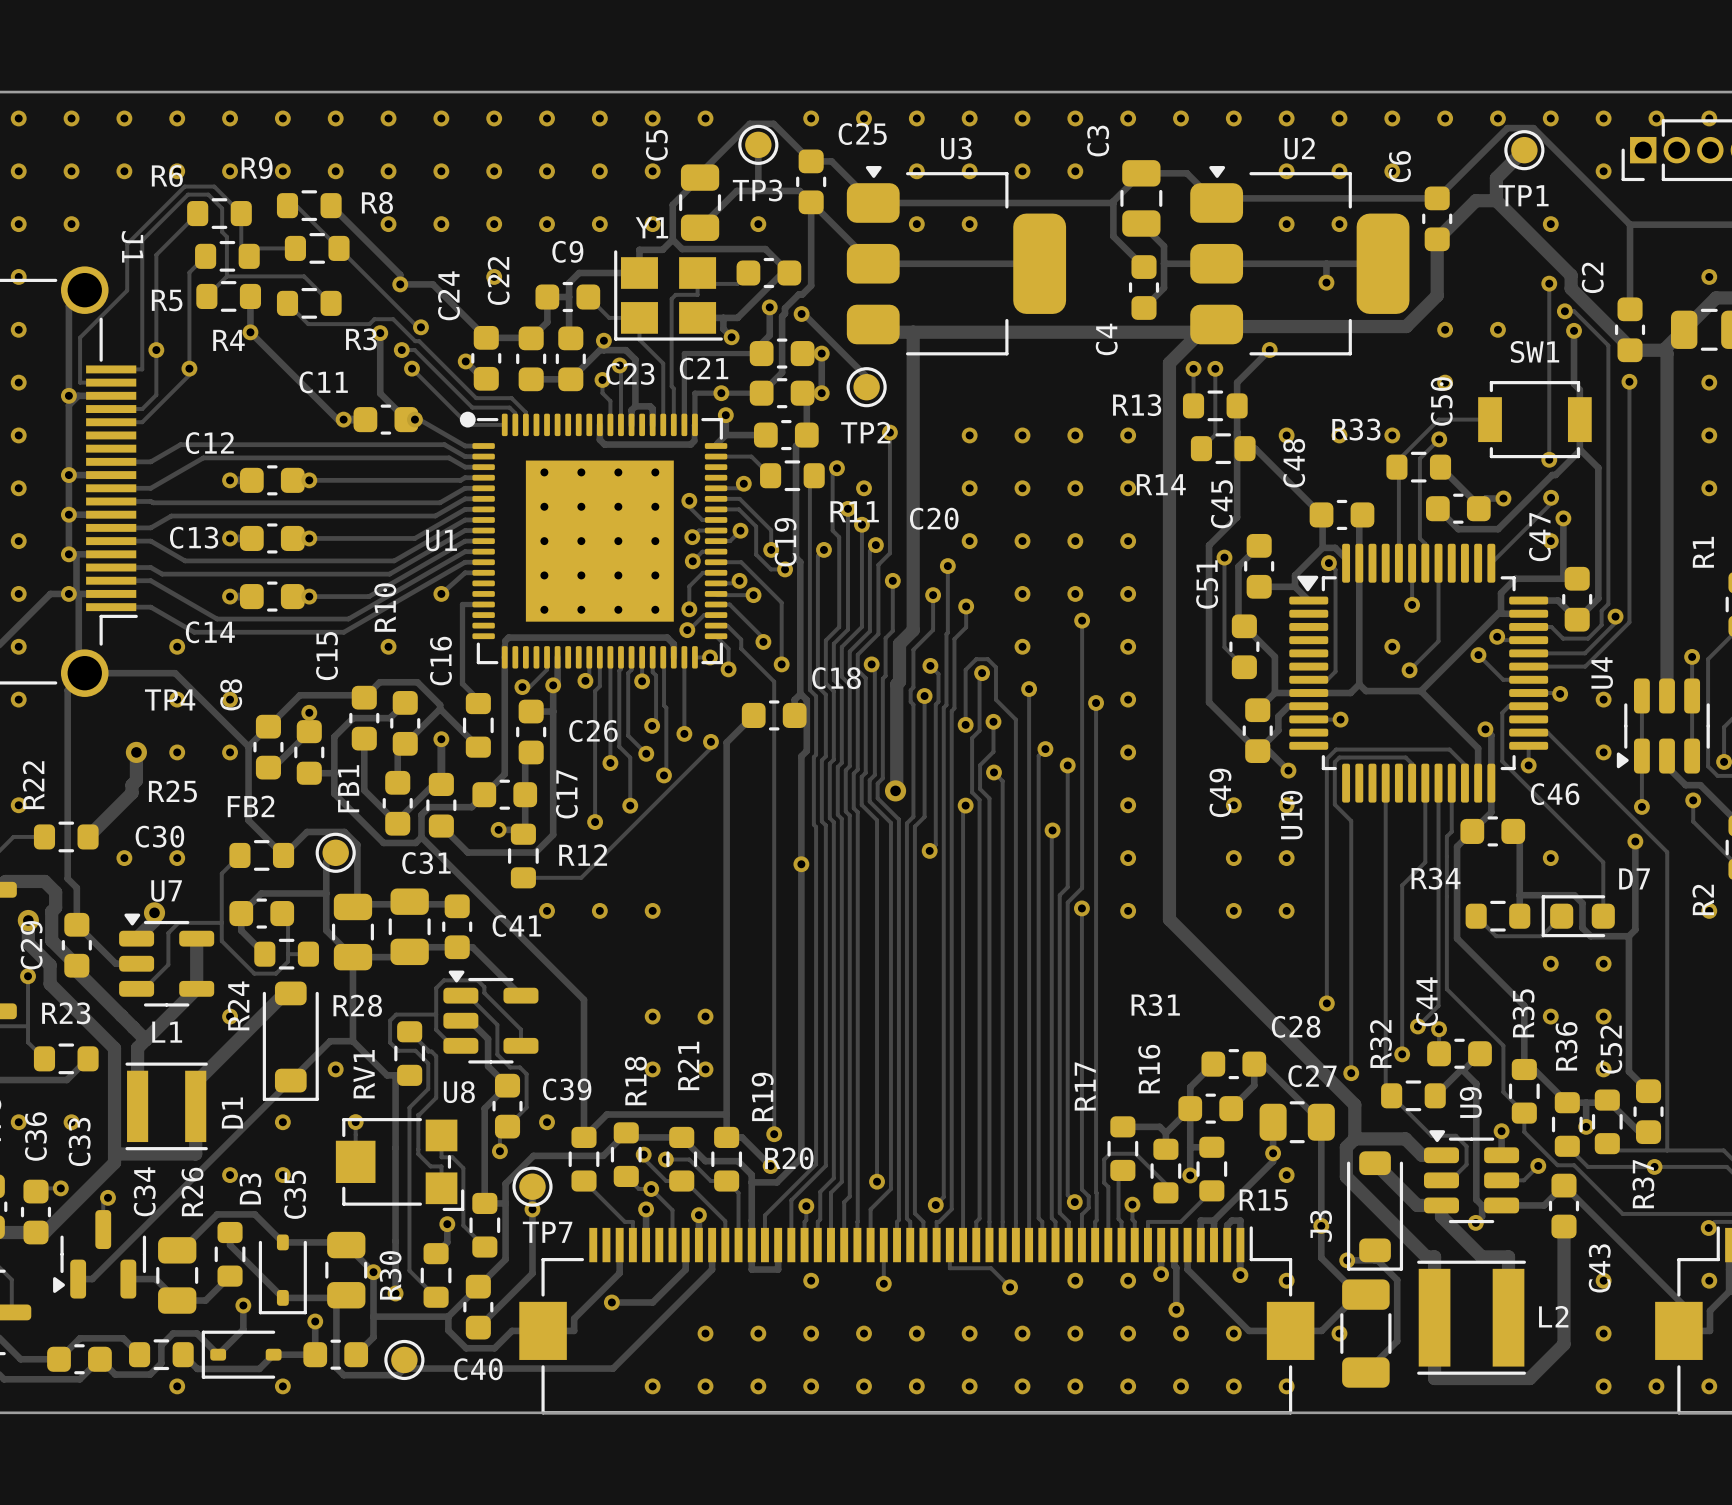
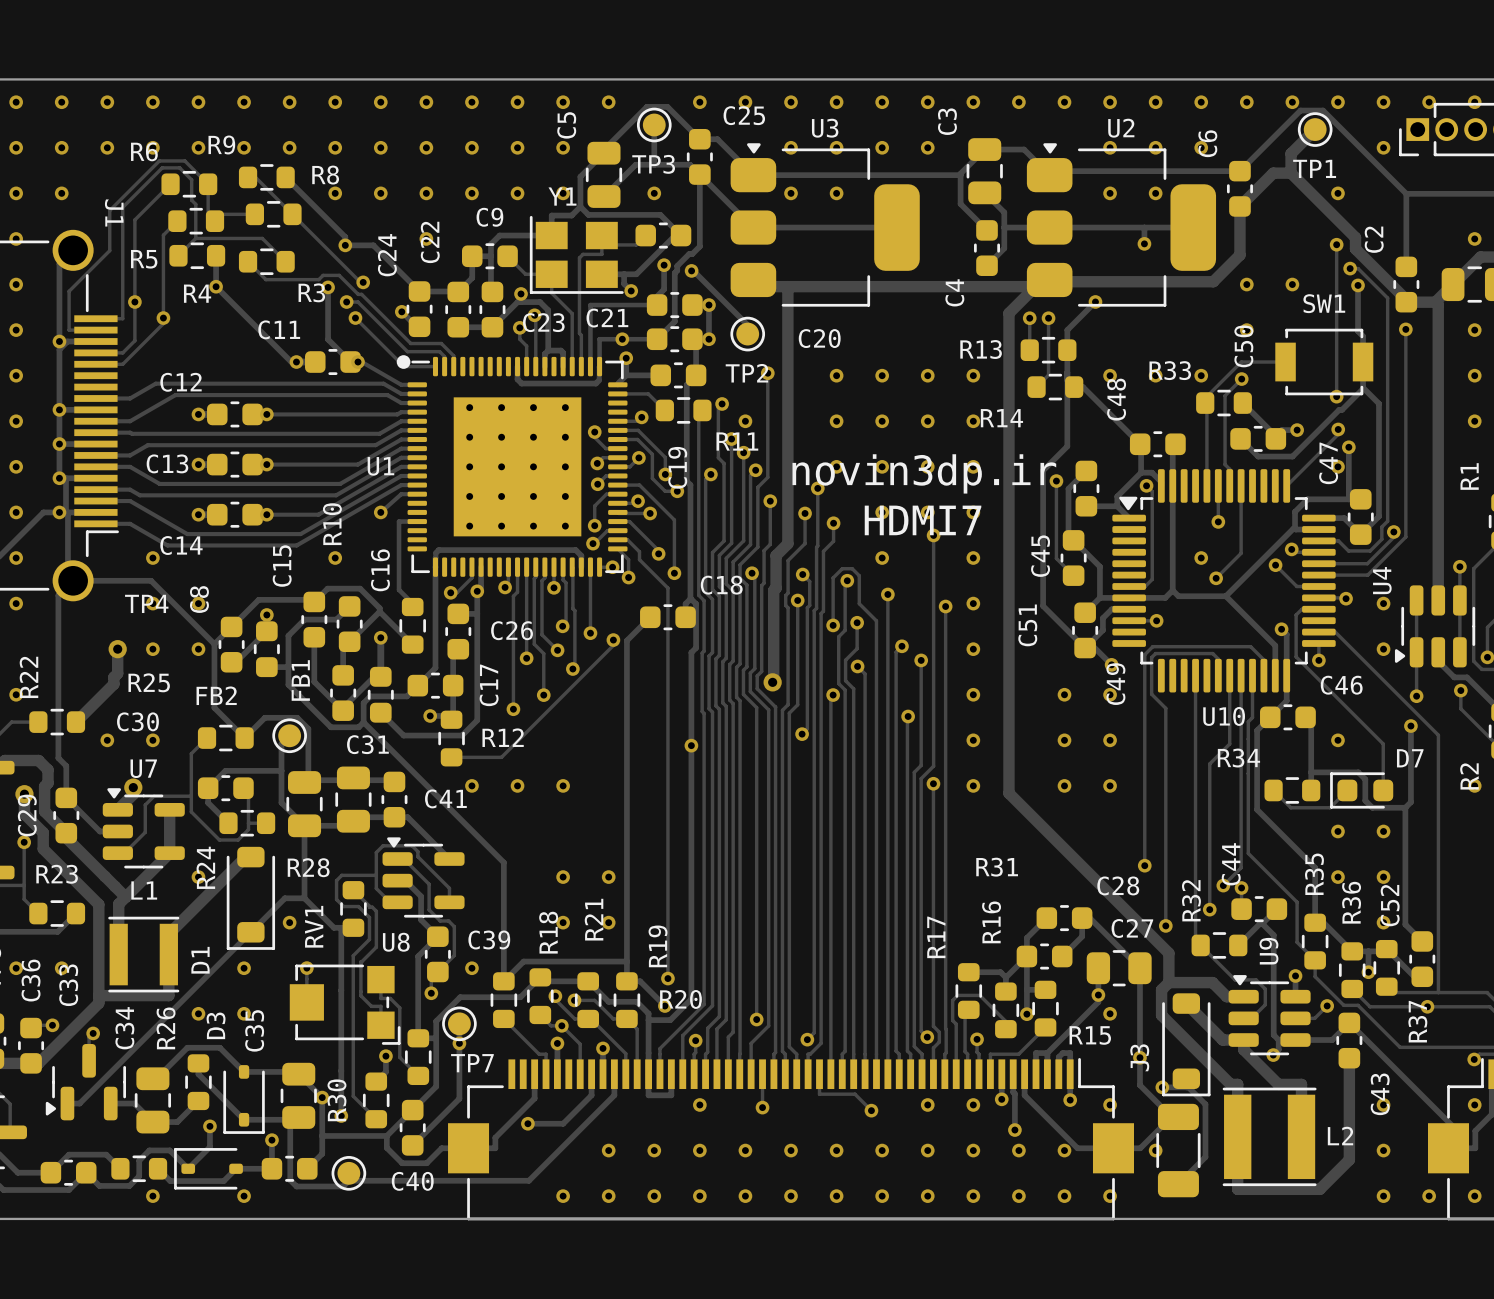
C45 name position: C45 (1221, 504) -> C45 (1040, 556)
C20 name position: C20 (934, 518) -> C20 (819, 338)
text: none -> novin3dp.ir (924, 473)
C51 name position: C51 (1207, 584) -> C51 (1027, 625)
text: none -> HDMI7 (923, 520)
C49 name position: C49 (1220, 792) -> C49 (1115, 684)
U10 name rotation: 0° (1291, 815) -> 90° clockwise (1224, 716)
U10 name position: U10 (1291, 815) -> U10 (1224, 716)

